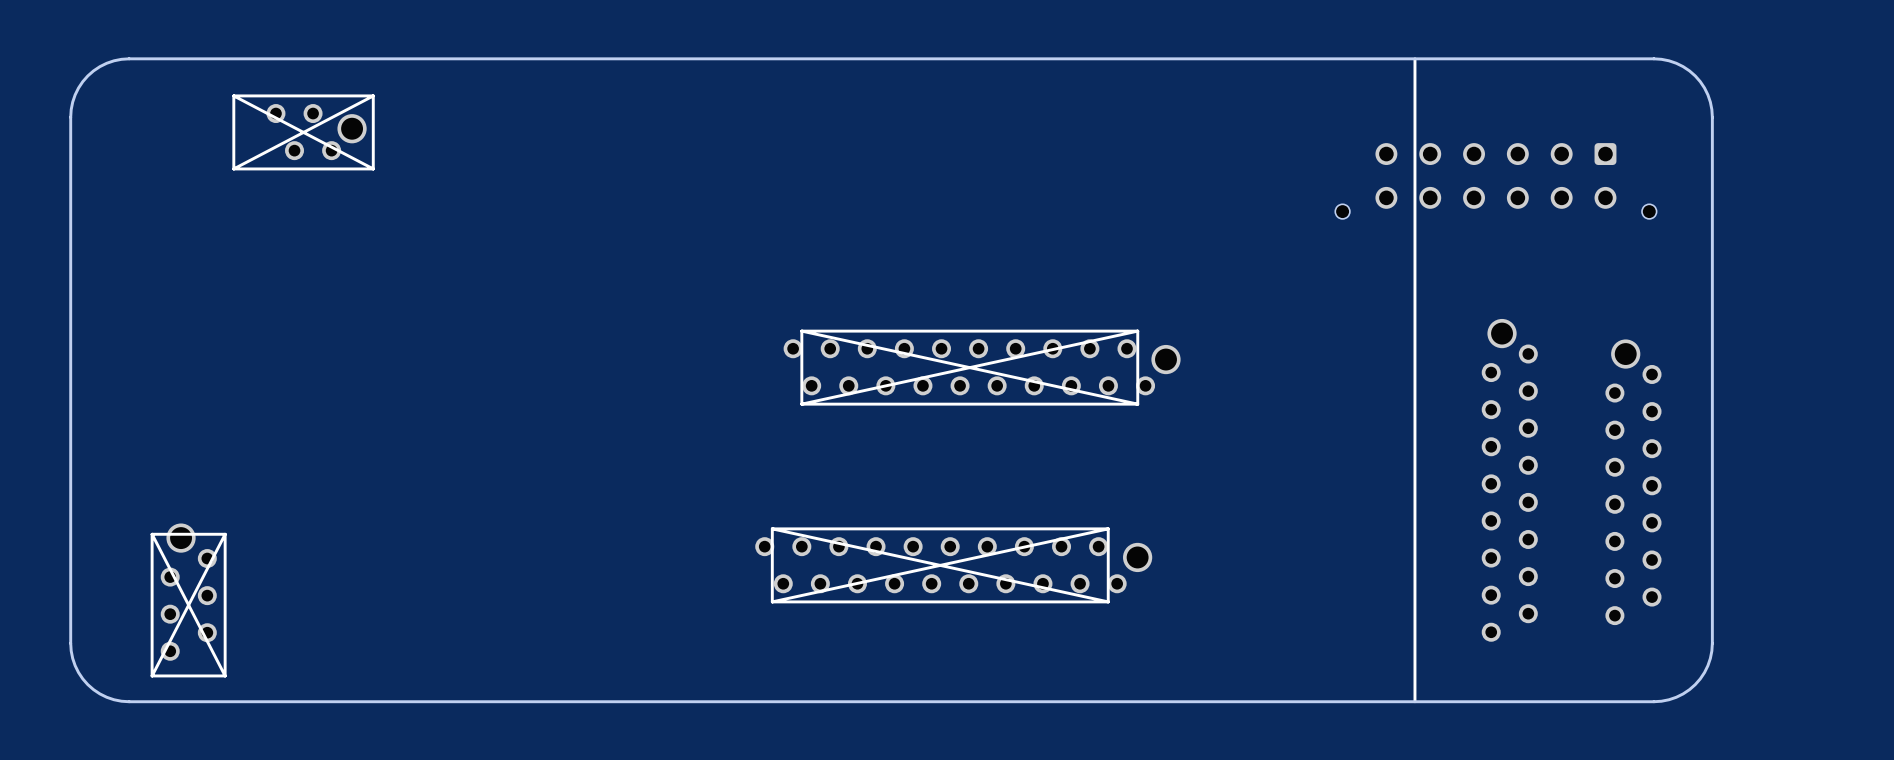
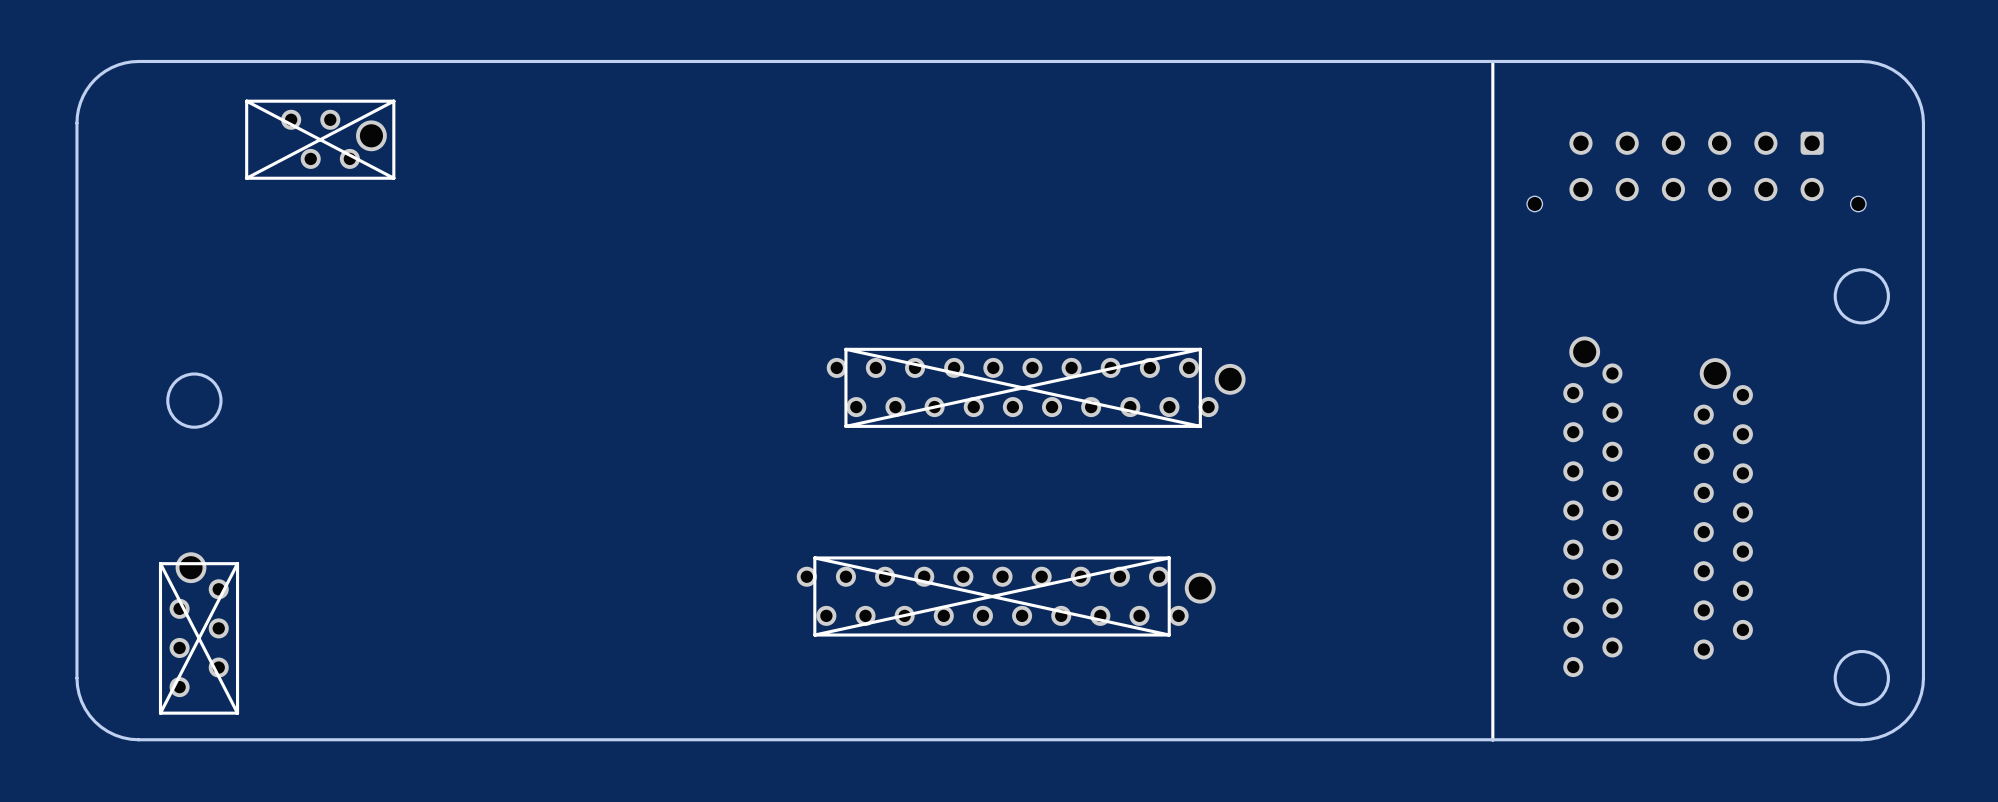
board edge: (1653, 58) (129, 58) (106, 63) (93, 70) (78, 88) (72, 102) (70, 117) (70, 643) (75, 665) (82, 678) (93, 689) (114, 699) (129, 701) (1653, 701) (1676, 697) (1689, 689) (1704, 672) (1710, 658) (1712, 643) (1712, 117) (1707, 94) (1695, 75) (1676, 63) (1653, 58) -> (1861, 61) (1885, 66) (1905, 79) (1918, 99) (1923, 123) (1923, 678) (1921, 694) (1915, 708) (1899, 727) (1885, 735) (1861, 739) (138, 739) (122, 737) (101, 727) (89, 715) (81, 701) (76, 678) (77, 116) (83, 96) (90, 84) (105, 70) (118, 64) (138, 61) (1861, 61)
part position: (1495, 180) -> (1696, 171)
round board edge: none -> [1833, 268, 1890, 325]
round board edge: none -> [166, 372, 223, 429]
round board edge: none -> [1833, 649, 1890, 707]

